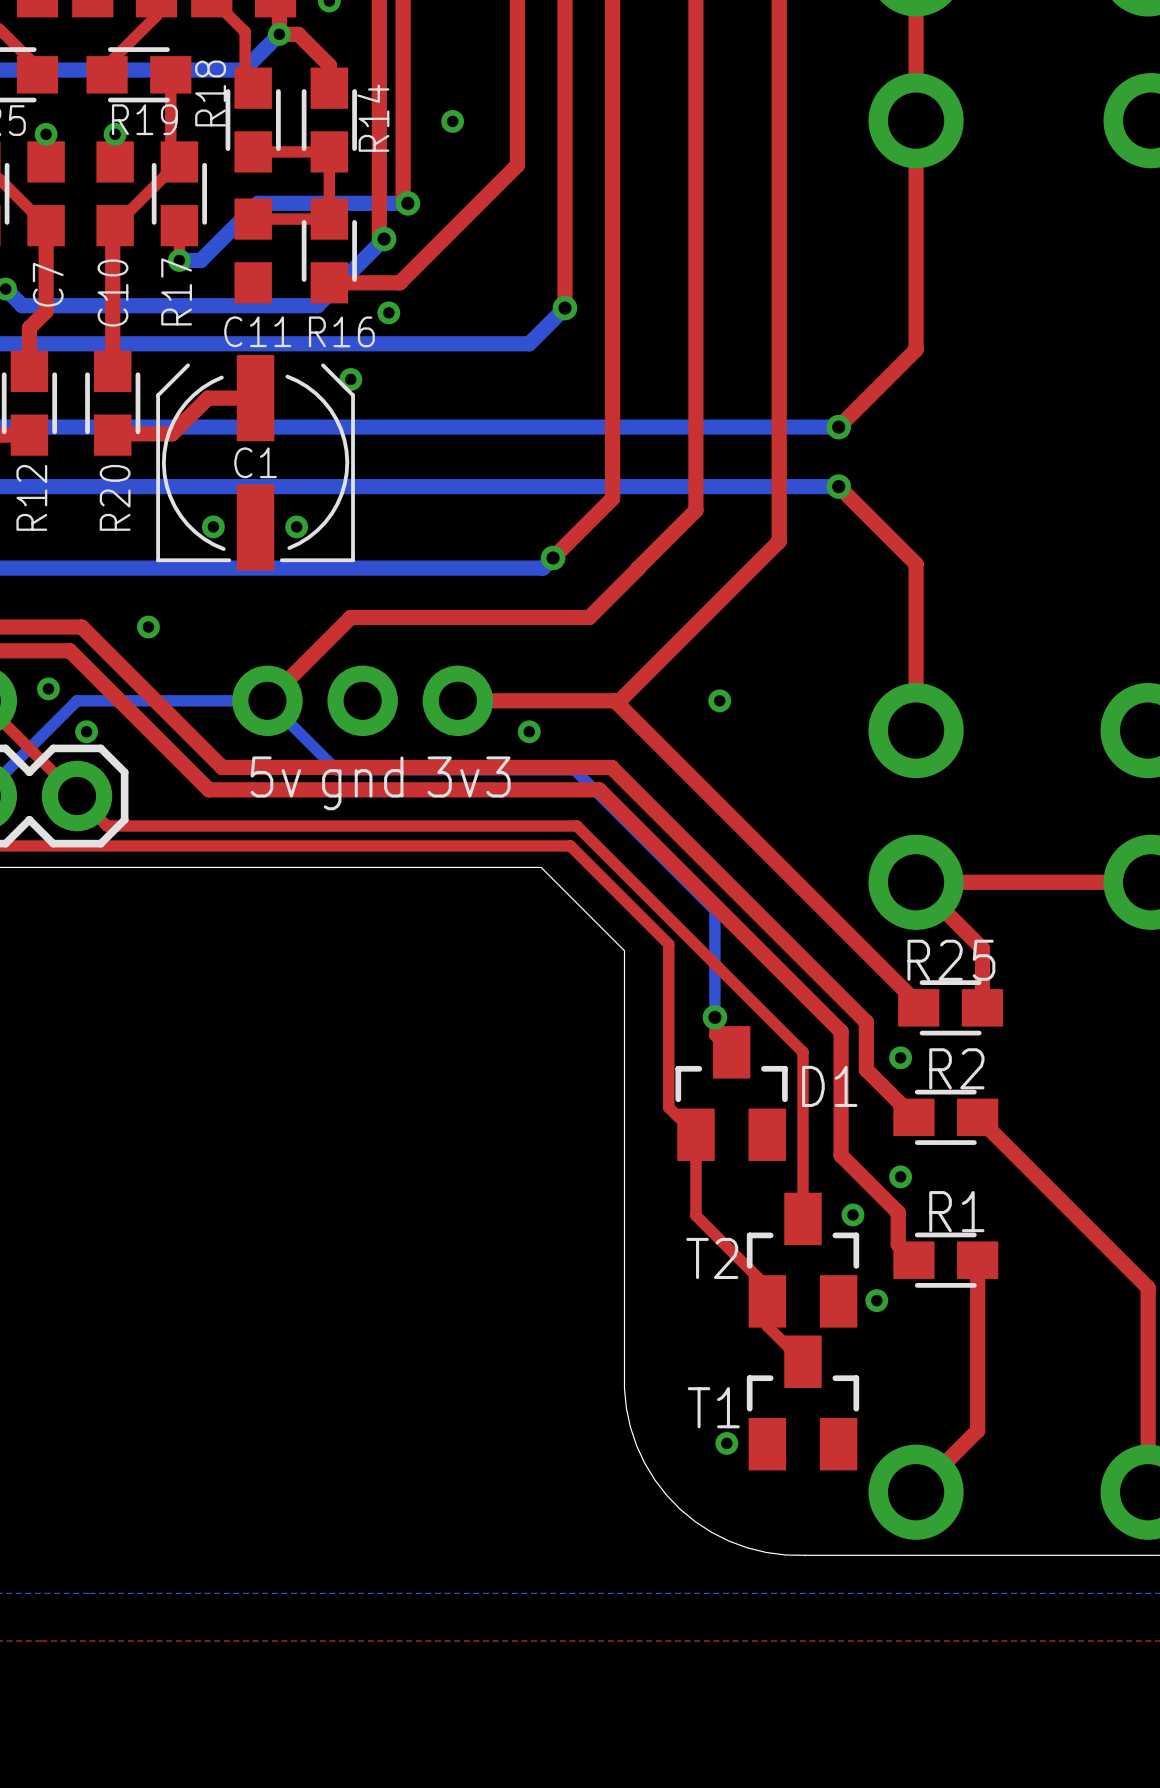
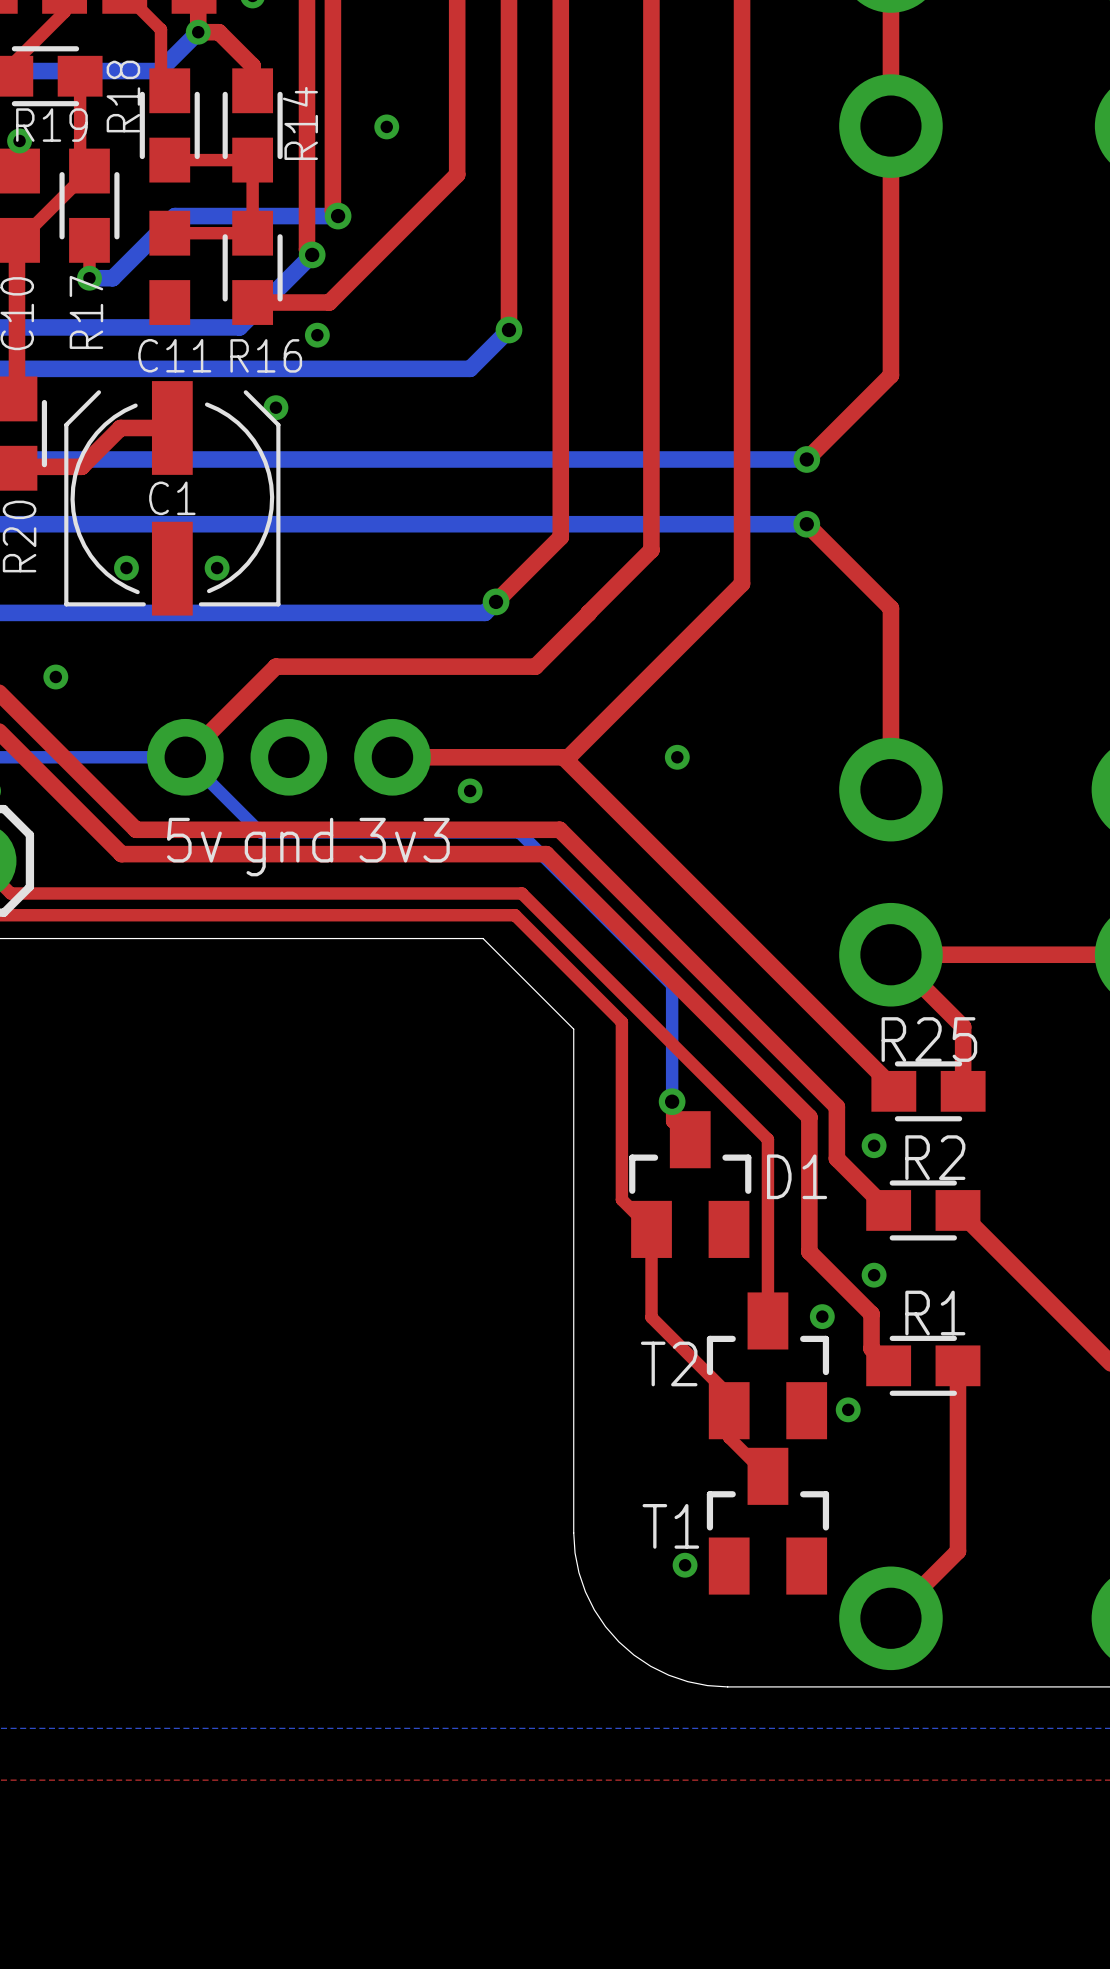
board edge: (624, 1388) (630, 1427) (636, 1445) (654, 1480) (680, 1509) (711, 1532) (747, 1547) (766, 1552) (805, 1555) -> (573, 1505) (575, 1553) (578, 1572) (594, 1609) (618, 1641) (650, 1666) (687, 1681) (727, 1686) (770, 1686)

